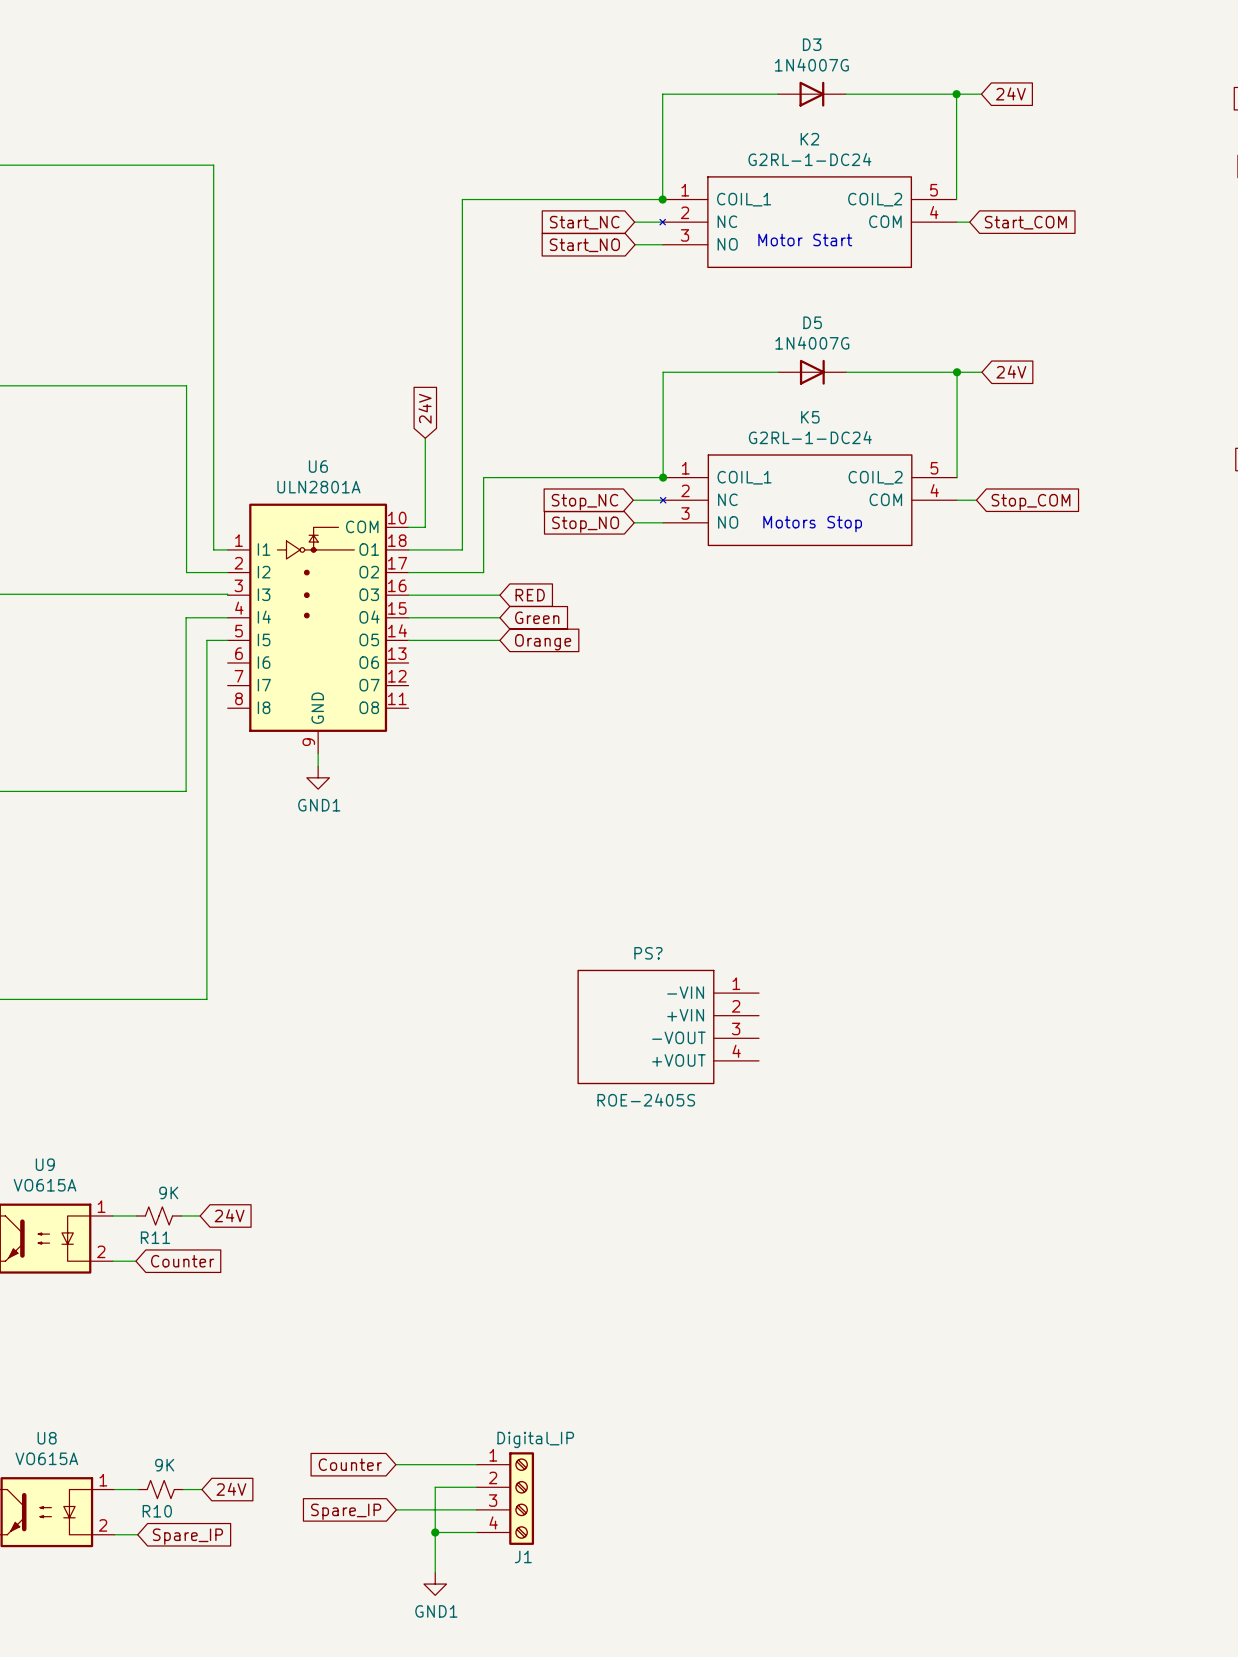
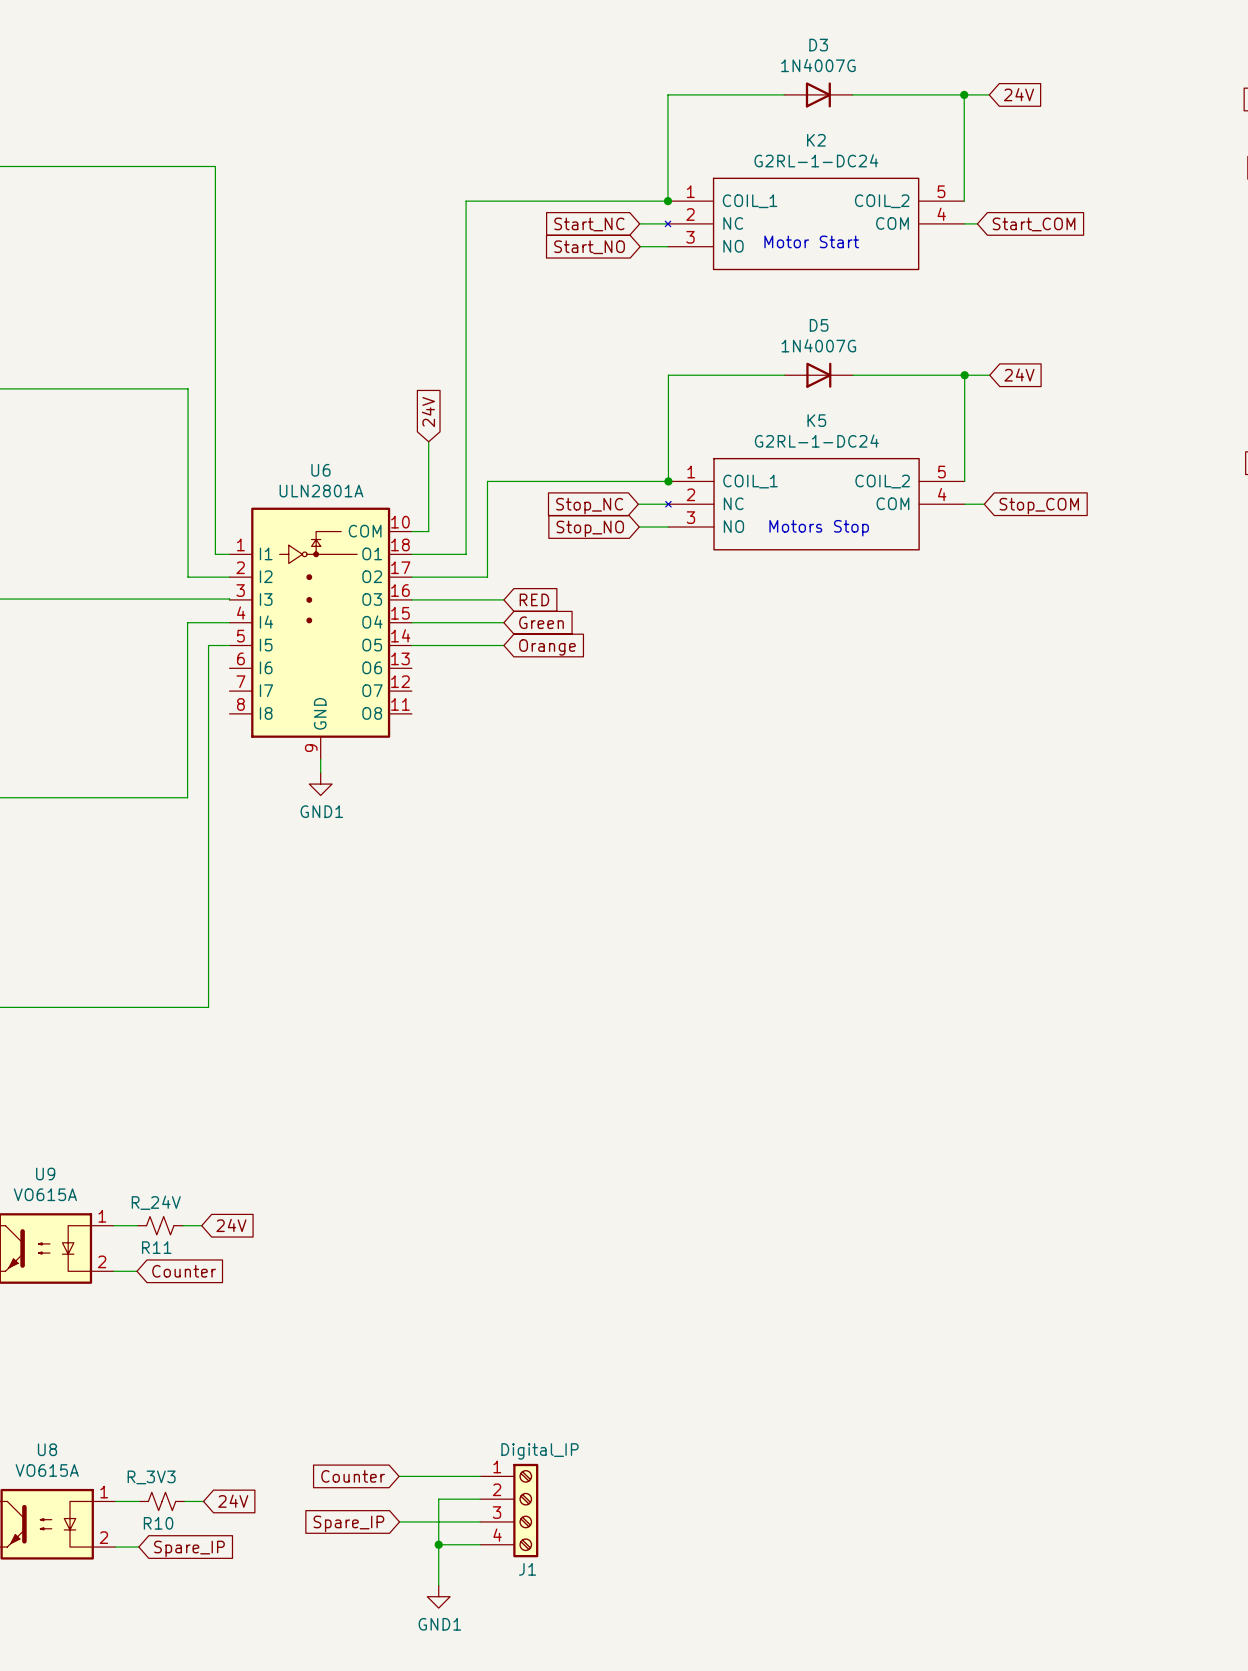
PS?: ROE-2405S (668, 1026) -> none
R11 value: 9K (168, 1192) -> R_24V (156, 1202)
R10 value: 9K (164, 1465) -> R_3V3 (151, 1477)

